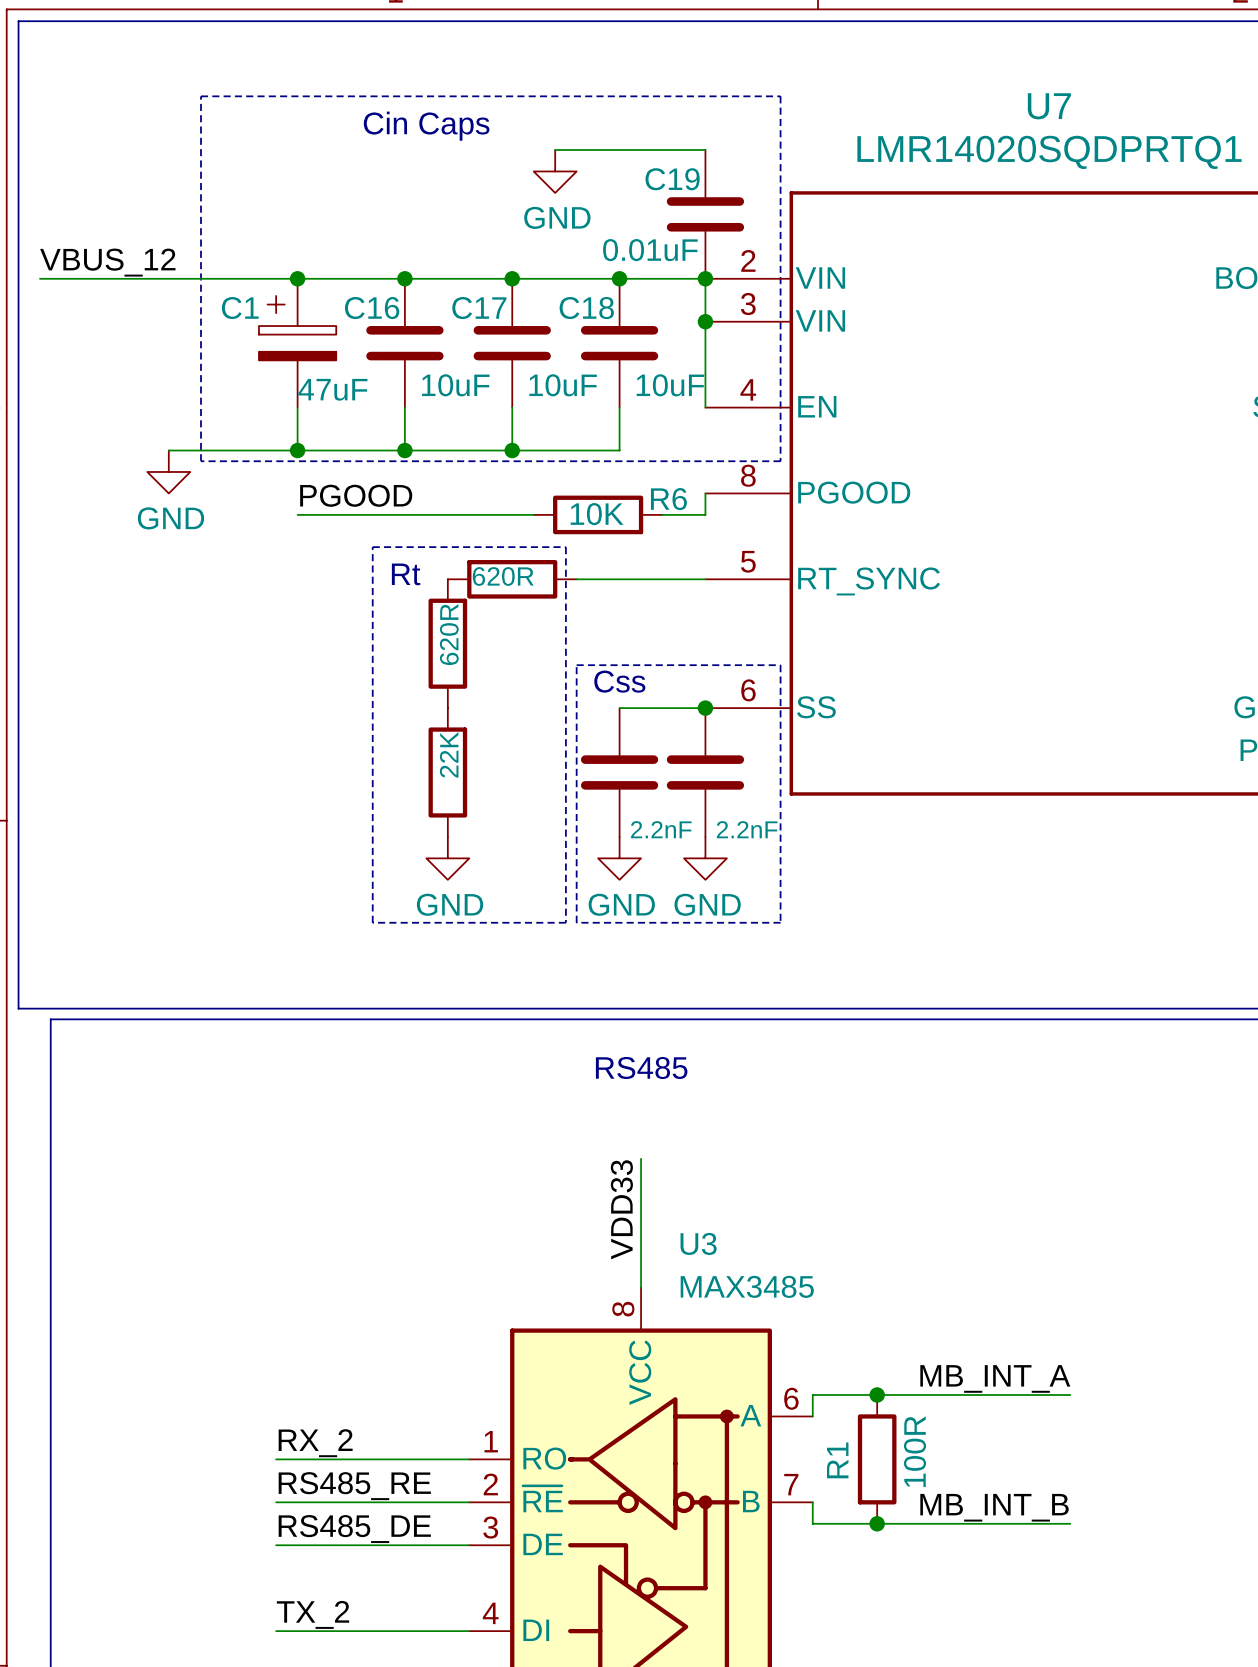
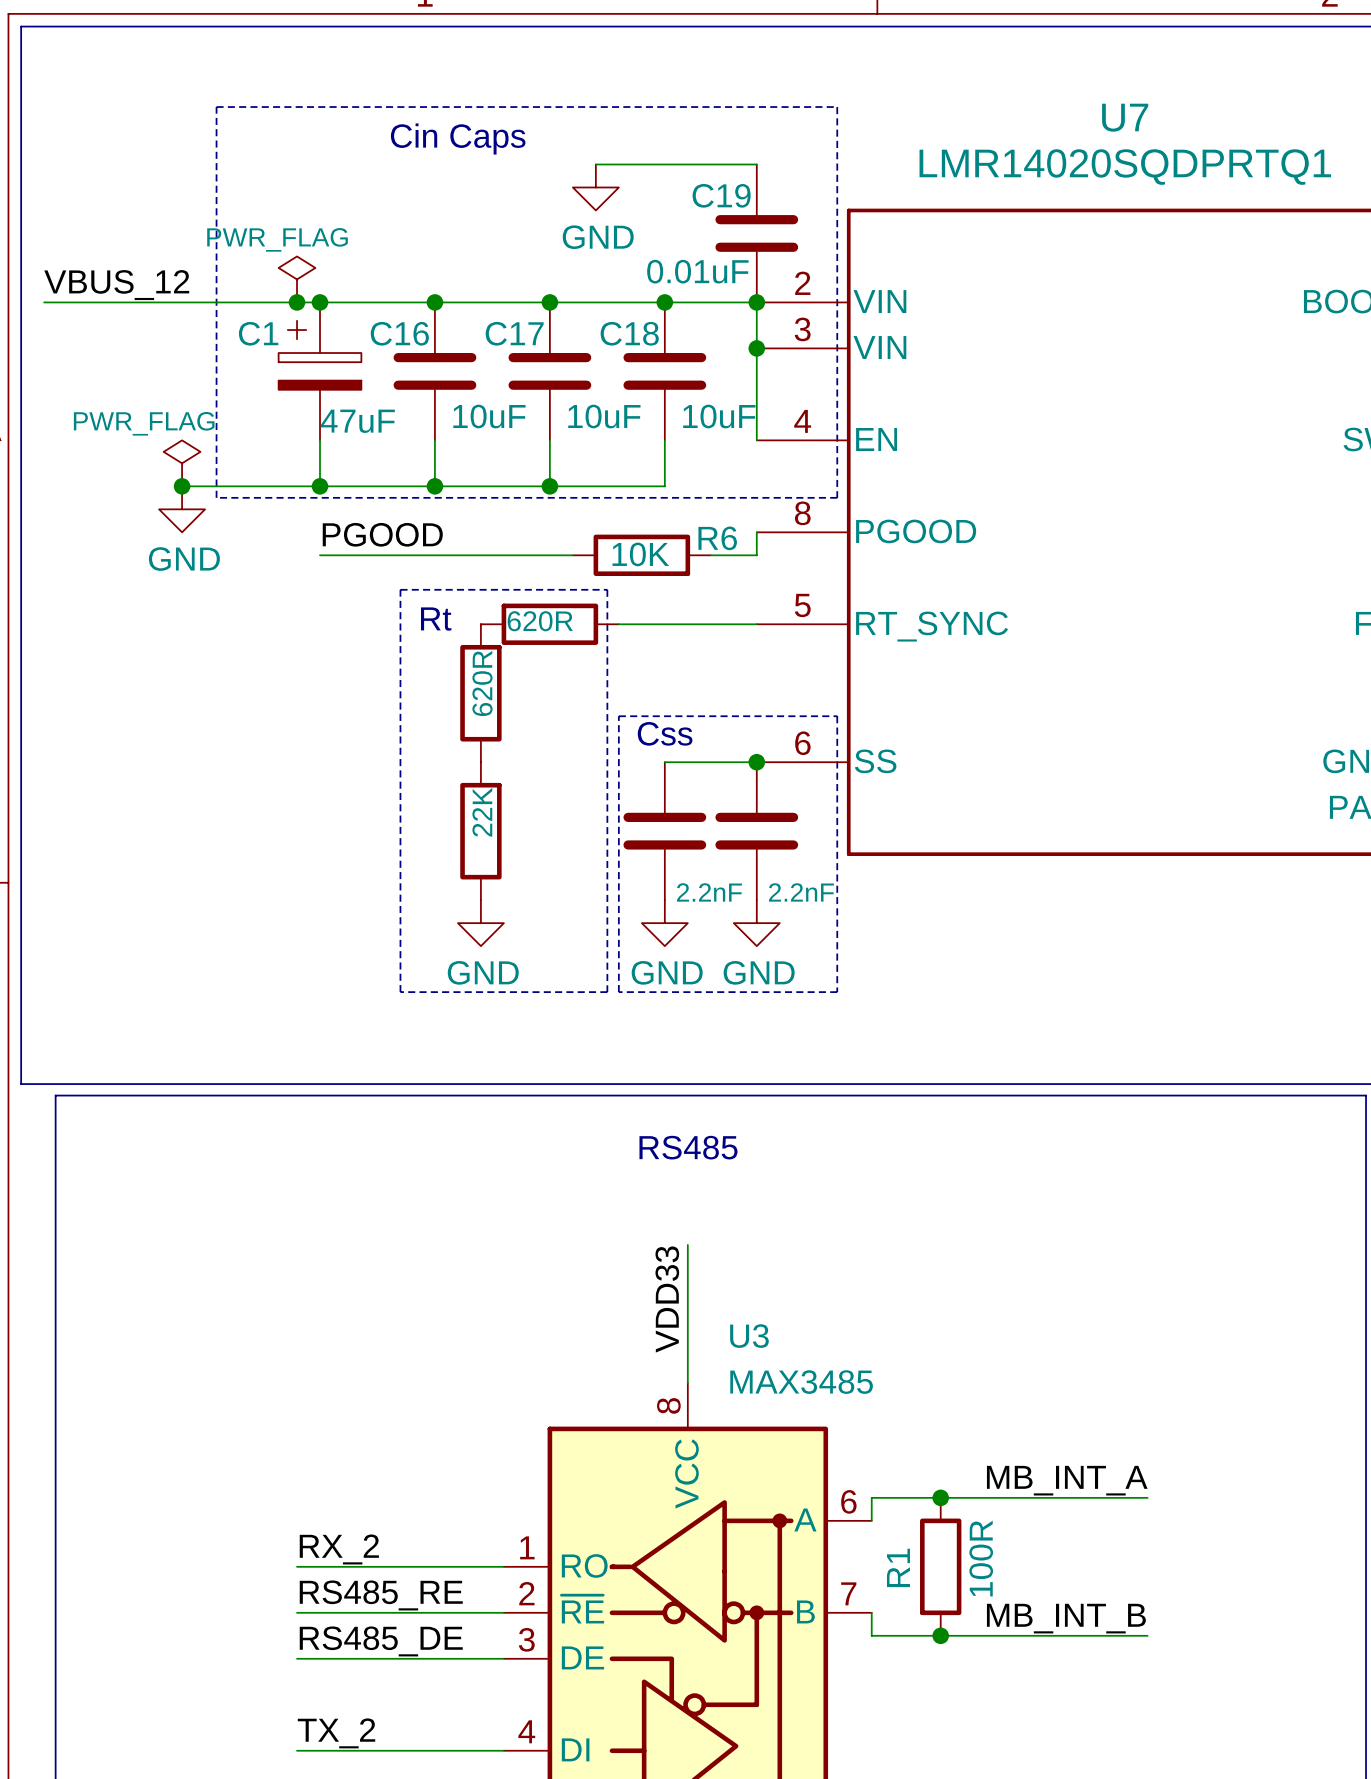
power symbol: none -> PWR_FLAG (297, 279)
junction: none -> (297, 302)
power symbol: none -> PWR_FLAG (182, 463)
junction: none -> (182, 486)

